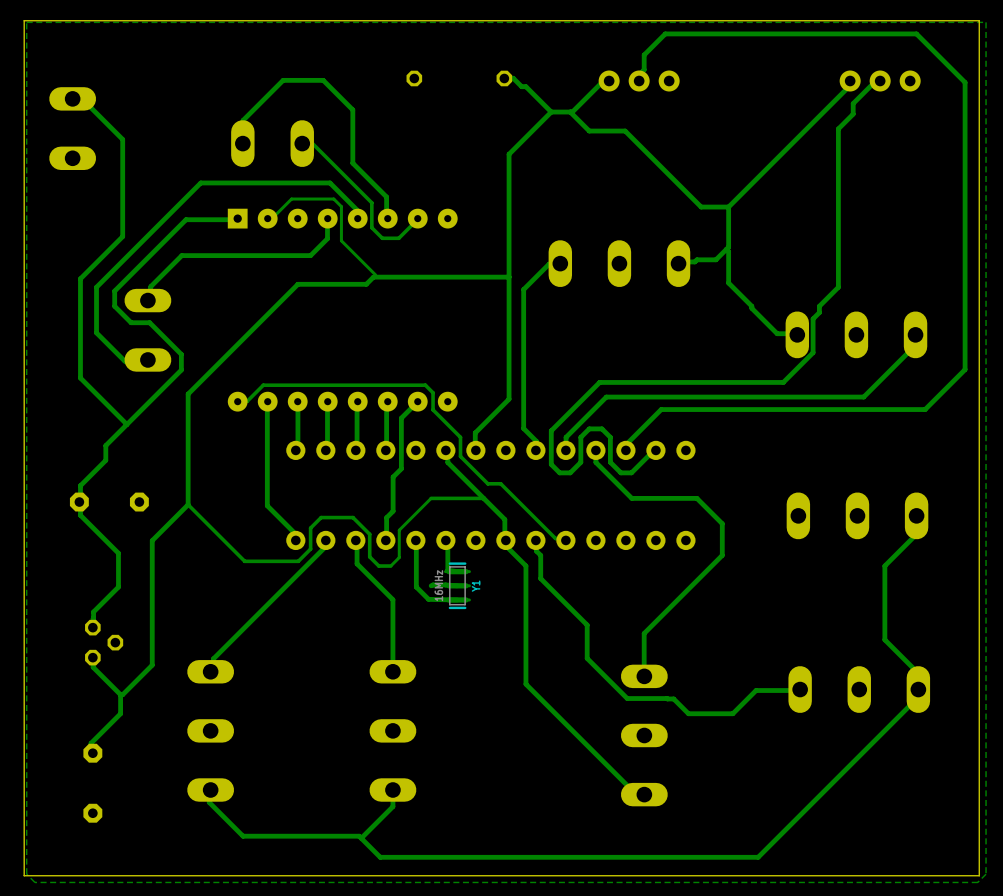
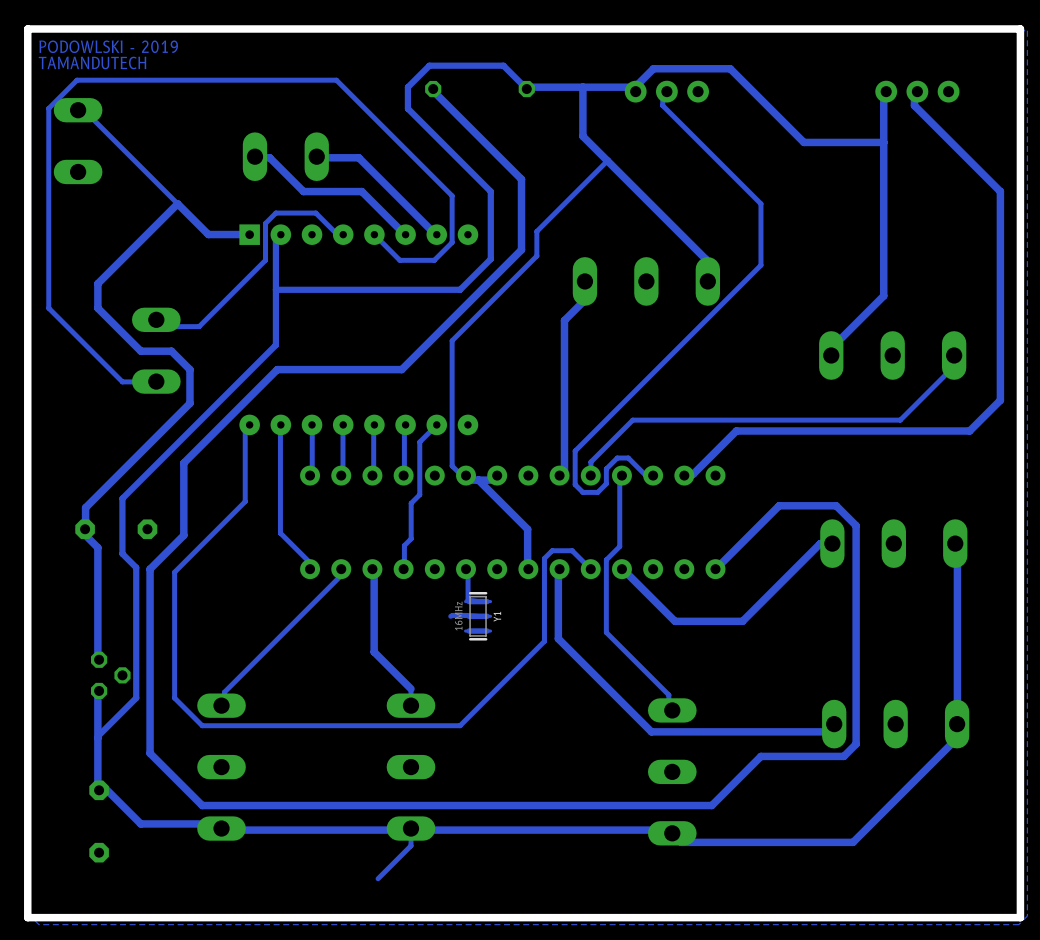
board edge width: thin (979, 20) (24, 20) (24, 875) (979, 875) (979, 20) -> thick (1020, 28) (27, 28) (27, 917) (1020, 917) (1020, 28)
text: none -> PODOWLSKI - 2019 (108, 46)
text: none -> TAMANDUTECH (92, 62)
track: none -> (433, 89) (521, 179) (521, 249) (401, 369) (277, 369) (183, 463) (183, 535) (150, 569) (150, 753) (202, 805) (711, 805) (760, 756) (843, 756) (856, 744) (856, 525) (836, 505) (779, 505) (715, 569)
track: (504, 78) (513, 78) (521, 86) (525, 86) (551, 112) -> none
track: (609, 81) (601, 82) (572, 112) (551, 112) -> none
track: (639, 81) (639, 74) (644, 69) (644, 55) (665, 33) (916, 33) (965, 82) (965, 369) (925, 409) (661, 409) (627, 443) (625, 450) -> (666, 91) (662, 93) (662, 105) (760, 203) (760, 265) (575, 451) (575, 484) (582, 492) (597, 492) (606, 483) (606, 468) (617, 458) (628, 458) (645, 475) (652, 475)
track: (850, 81) (848, 86) (728, 207) -> (886, 91) (883, 93) (883, 295) (828, 351) (831, 355)
track: (880, 81) (874, 82) (853, 103) (853, 114) (838, 128) (838, 287) (819, 306) (819, 312) (813, 318) (813, 352) (783, 382) (599, 382) (551, 430) (551, 464) (559, 472) (570, 472) (580, 462) (580, 437) (589, 428) (601, 428) (610, 437) (610, 462) (620, 472) (631, 472) (655, 450) -> (917, 91) (914, 93) (914, 105) (1000, 191) (1000, 400) (969, 431) (736, 431) (693, 473) (684, 475)
track: (72, 98) (82, 99) (122, 139) (122, 236) (80, 278) (80, 378) (126, 424) -> none
track: none -> (93, 110) (93, 119) (177, 203)
track: (551, 112) (509, 154) (509, 399) (475, 432) (475, 450) -> (607, 160) (536, 231) (536, 256) (452, 340) (452, 466) (460, 473) (466, 475) (466, 480) (496, 480) (497, 475)
track: (570, 112) (589, 131) (625, 131) (701, 207) (728, 207) -> none
track: none -> (883, 142) (803, 142) (730, 68) (653, 68) (635, 86) (635, 91) (632, 87) (527, 87) (526, 89) (503, 65) (429, 65) (407, 87) (407, 108) (490, 191) (490, 259) (460, 289) (275, 289)
track: (242, 143) (243, 120) (283, 80) (323, 80) (352, 109) (352, 163) (386, 197) (387, 218) -> (254, 156) (269, 157) (303, 191) (361, 191) (405, 234)
track: (302, 143) (310, 141) (371, 202) (371, 227) (382, 238) (398, 238) (417, 218) -> (316, 156) (358, 157) (436, 234)
track: none -> (177, 203) (208, 234) (249, 234)
track: (728, 207) (728, 247) (715, 259) (696, 259) (694, 261) (680, 261) (678, 263) -> (582, 87) (582, 136) (705, 259) (705, 277) (707, 281)
track: (237, 218) (186, 219) (114, 291) (114, 306) (131, 322) (149, 322) (181, 354) (181, 370) (105, 445) (105, 460) (80, 485) (80, 515) (118, 553) (118, 587) (93, 611) (92, 627) -> (177, 203) (97, 283) (97, 308) (140, 351) (171, 351) (189, 369) (189, 403) (85, 507) (85, 529) (79, 529) (97, 547) (99, 659)
track: (267, 218) (273, 217) (291, 199) (333, 199) (341, 206) (341, 240) (375, 275) -> (280, 234) (275, 240) (275, 345) (122, 498) (122, 553) (136, 567) (136, 698) (97, 737)
track: (327, 218) (327, 238) (310, 255) (181, 255) (150, 286) (147, 300) -> (343, 234) (337, 234) (315, 213) (275, 213) (265, 223) (265, 260) (199, 326) (165, 326) (156, 319)
track: (357, 218) (357, 210) (330, 182) (200, 182) (96, 287) (96, 332) (124, 361) (147, 359) -> (374, 234) (399, 260) (434, 260) (452, 242) (452, 195) (336, 80) (77, 80) (48, 108) (48, 308) (122, 381) (156, 381)
track: (726, 249) (728, 251) (728, 283) (777, 333) (797, 334) -> none
track: (560, 263) (549, 264) (523, 289) (523, 428) (536, 441) (535, 450) -> (584, 281) (582, 283) (582, 302) (564, 320) (564, 473) (559, 475)
track: (509, 277) (373, 277) (366, 284) (297, 284) (188, 394) (188, 504) -> none
track: (237, 401) (247, 401) (263, 385) (425, 385) (433, 392) (433, 409) (460, 437) (460, 456) (487, 483) (500, 483) (555, 538) (563, 538) (565, 540) -> (249, 424) (245, 431) (245, 501) (174, 572) (174, 698) (202, 725) (460, 725) (544, 641) (544, 558) (552, 550) (572, 550) (590, 569)
track: (445, 450) (447, 451) (447, 462) (504, 519) (506, 546) (525, 565) (525, 684) (635, 793) (644, 794) -> none
track: (595, 450) (595, 462) (631, 498) (696, 498) (722, 523) (722, 555) (644, 633) (644, 676) -> (621, 475) (619, 480) (619, 546) (606, 559) (606, 632) (668, 695) (668, 707) (672, 710)
track: none -> (478, 480) (527, 529) (528, 569)
track: (483, 498) (431, 498) (399, 530) (399, 557) (390, 566) (378, 566) (369, 556) (369, 534) (353, 517) (321, 517) (310, 528) (310, 549) (298, 561) (244, 561) (188, 504) -> none
track: (188, 504) (152, 540) (152, 665) (120, 694) -> none
track: none -> (832, 543) (820, 543) (742, 621) (675, 621) (621, 569)
track: (916, 515) (916, 534) (884, 565) (884, 639) (916, 671) (916, 688) (918, 689) (916, 690) (916, 698) (758, 857) (380, 857) (359, 836) (243, 836) (209, 802) (210, 790) -> (955, 543) (957, 547) (957, 719) (957, 724) (951, 725) (951, 744) (853, 842) (681, 842) (668, 830) (226, 830) (221, 828) (220, 823) (140, 823) (104, 787) (99, 790) (97, 787) (97, 695) (99, 690) (102, 690)
track: (355, 540) (357, 563) (392, 599) (392, 655) -> (372, 569) (374, 572) (374, 652) (411, 688)
track: (416, 540) (416, 587) (428, 599) (457, 599) -> none
track: (535, 540) (536, 551) (540, 555) (540, 578) (587, 625) (587, 658) (627, 698) (673, 698) (688, 713) (732, 713) (756, 690) (800, 689) -> (559, 569) (558, 638) (651, 731) (828, 731) (834, 724)
track: (92, 657) (93, 667) (120, 694) -> none
track: (120, 694) (120, 713) (91, 743) (91, 751) (92, 753) -> none

